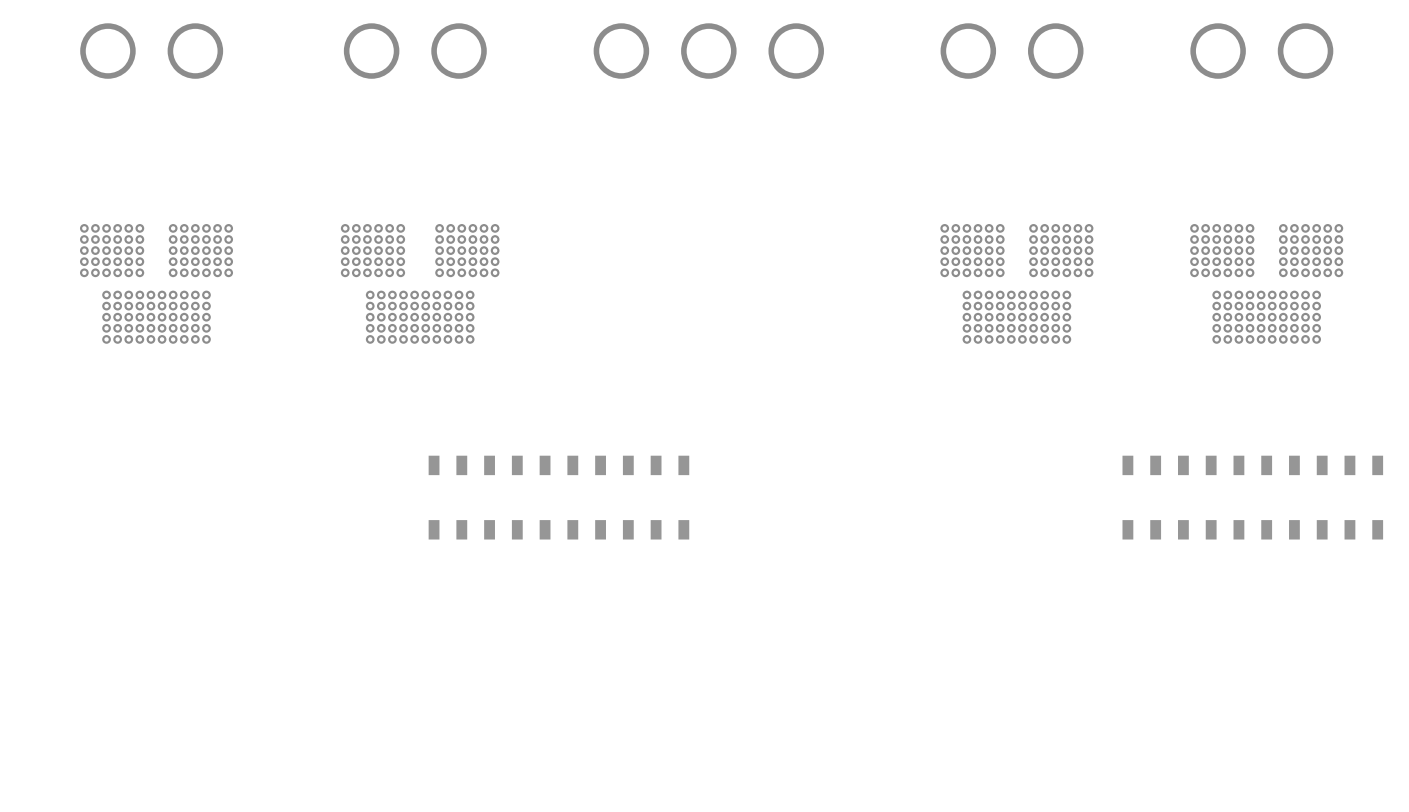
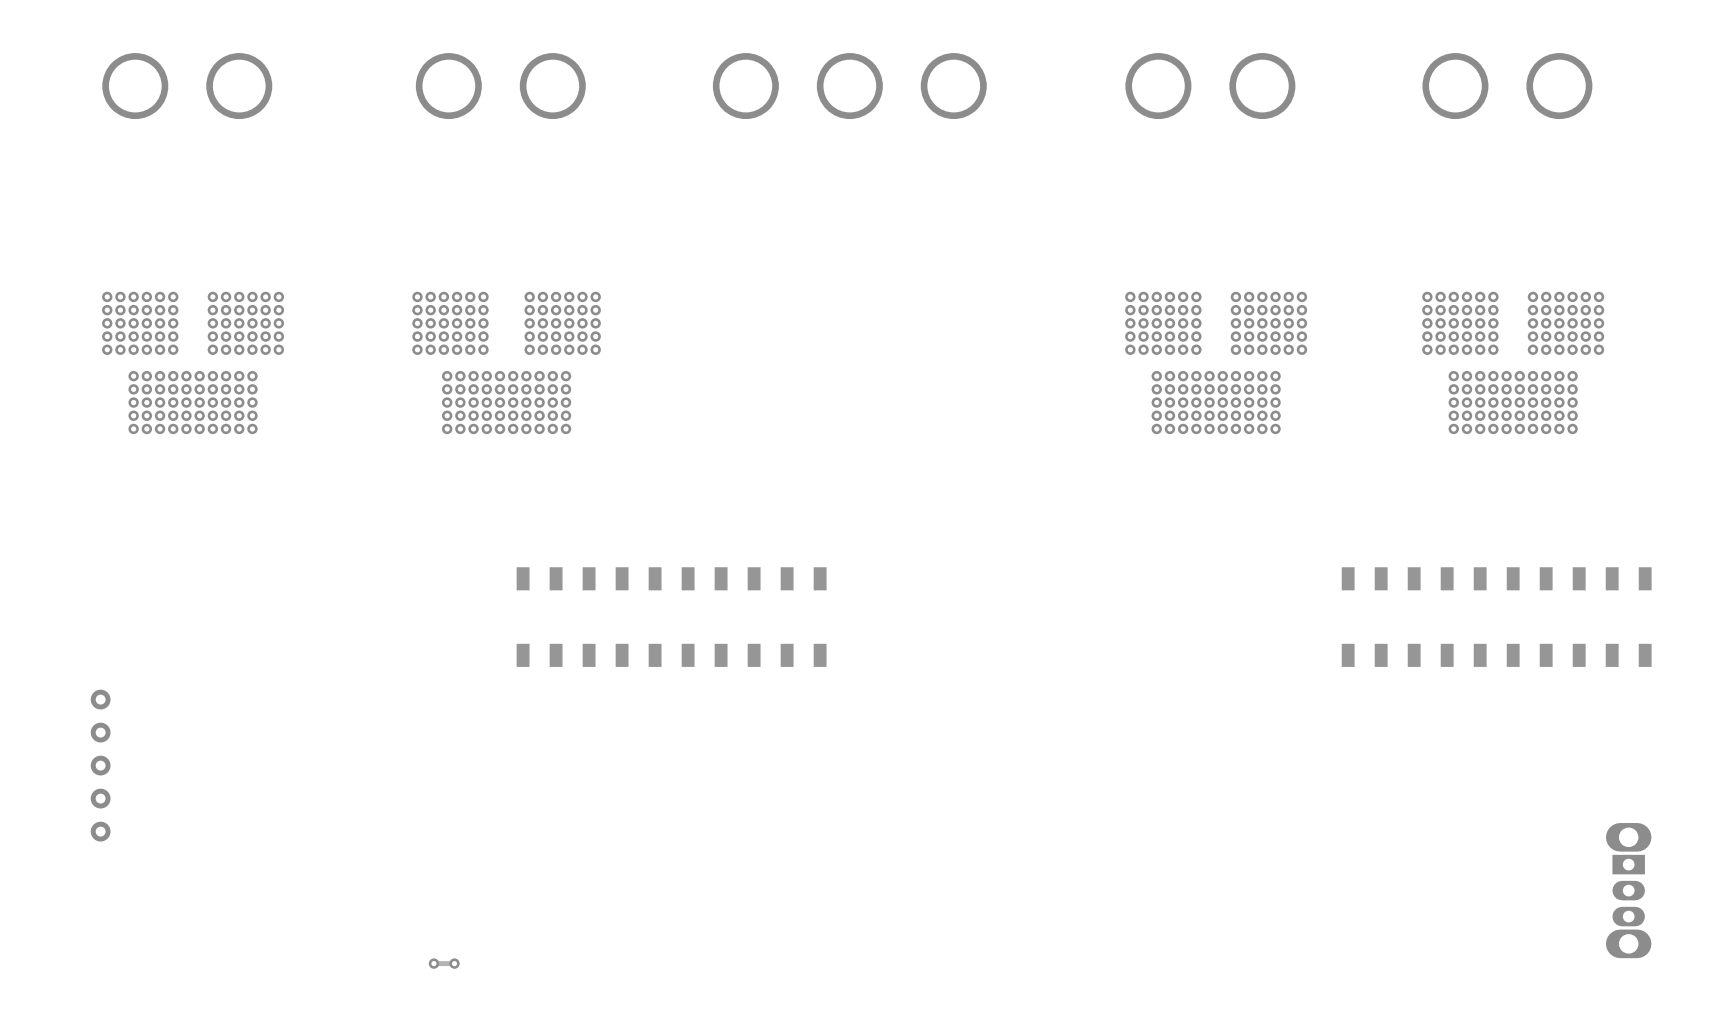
part: none -> (100, 765)
part: none -> (1628, 890)
via: none -> (433, 963)
track: none -> (454, 963) (433, 963)
via: none -> (454, 963)

